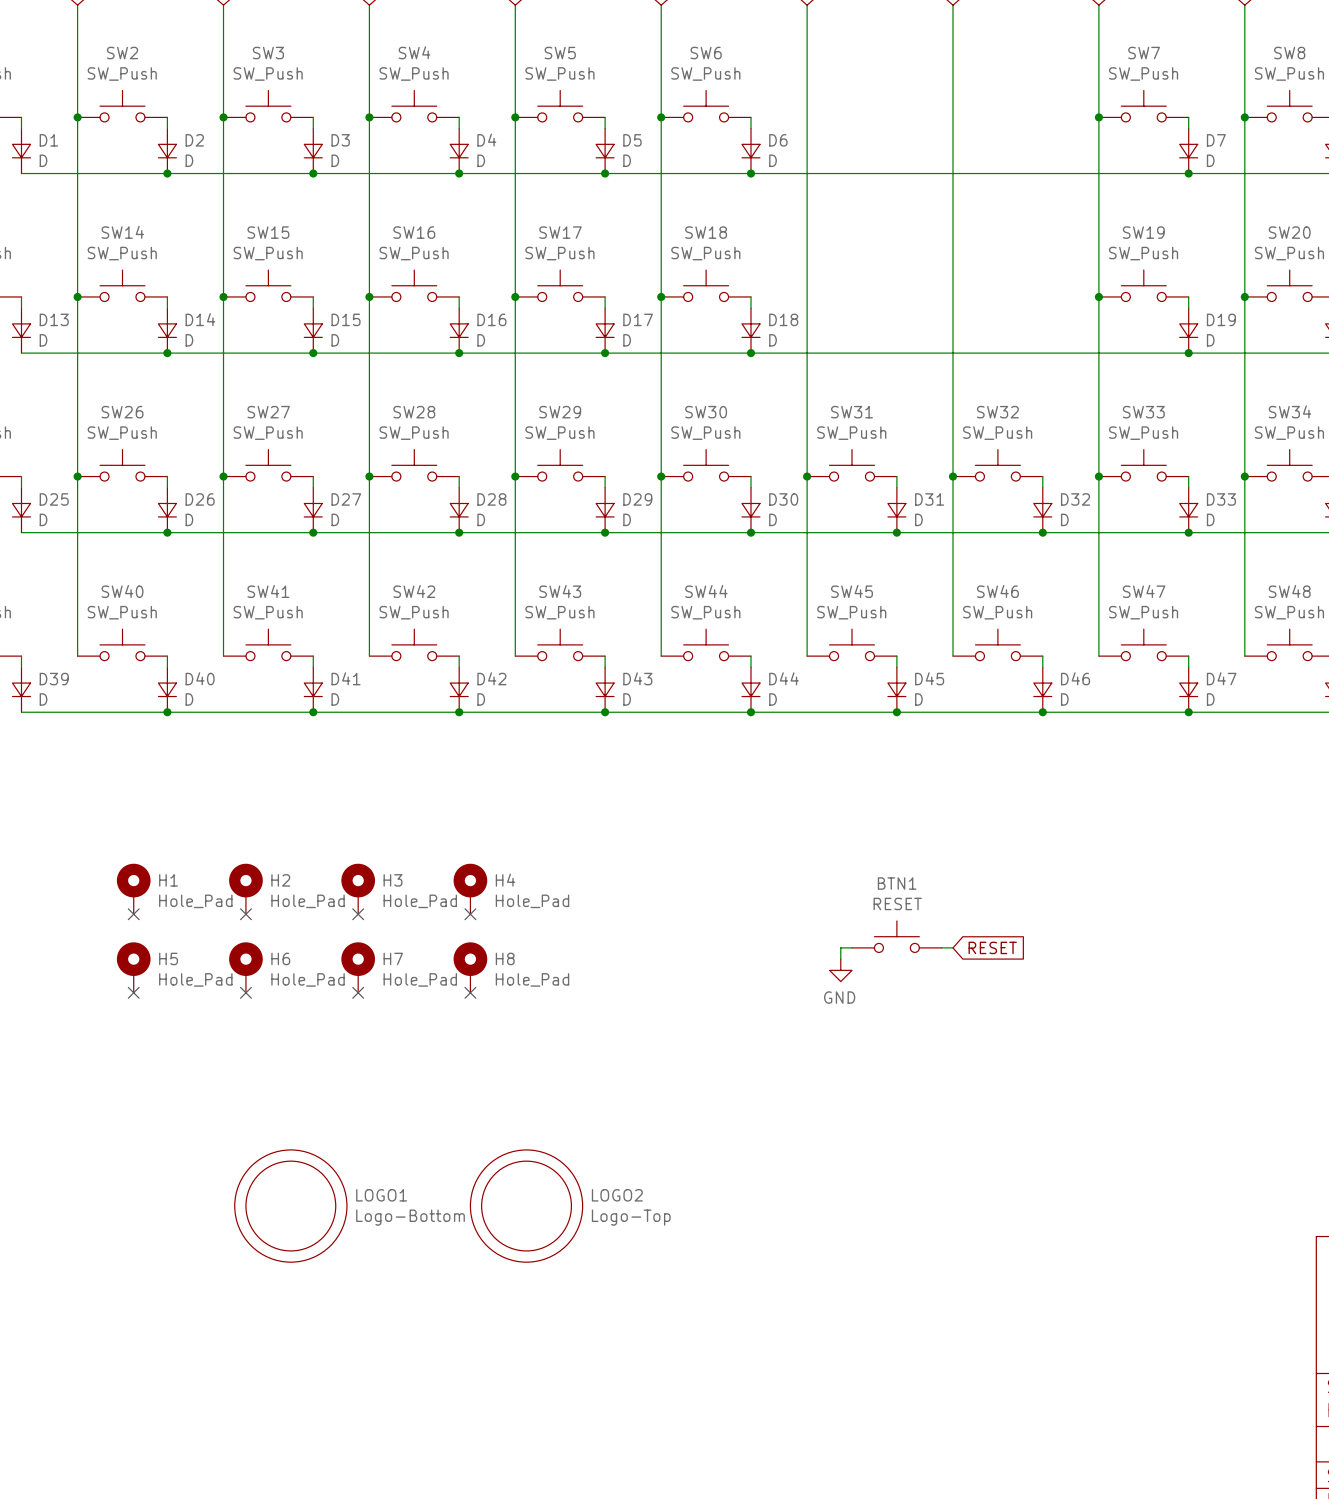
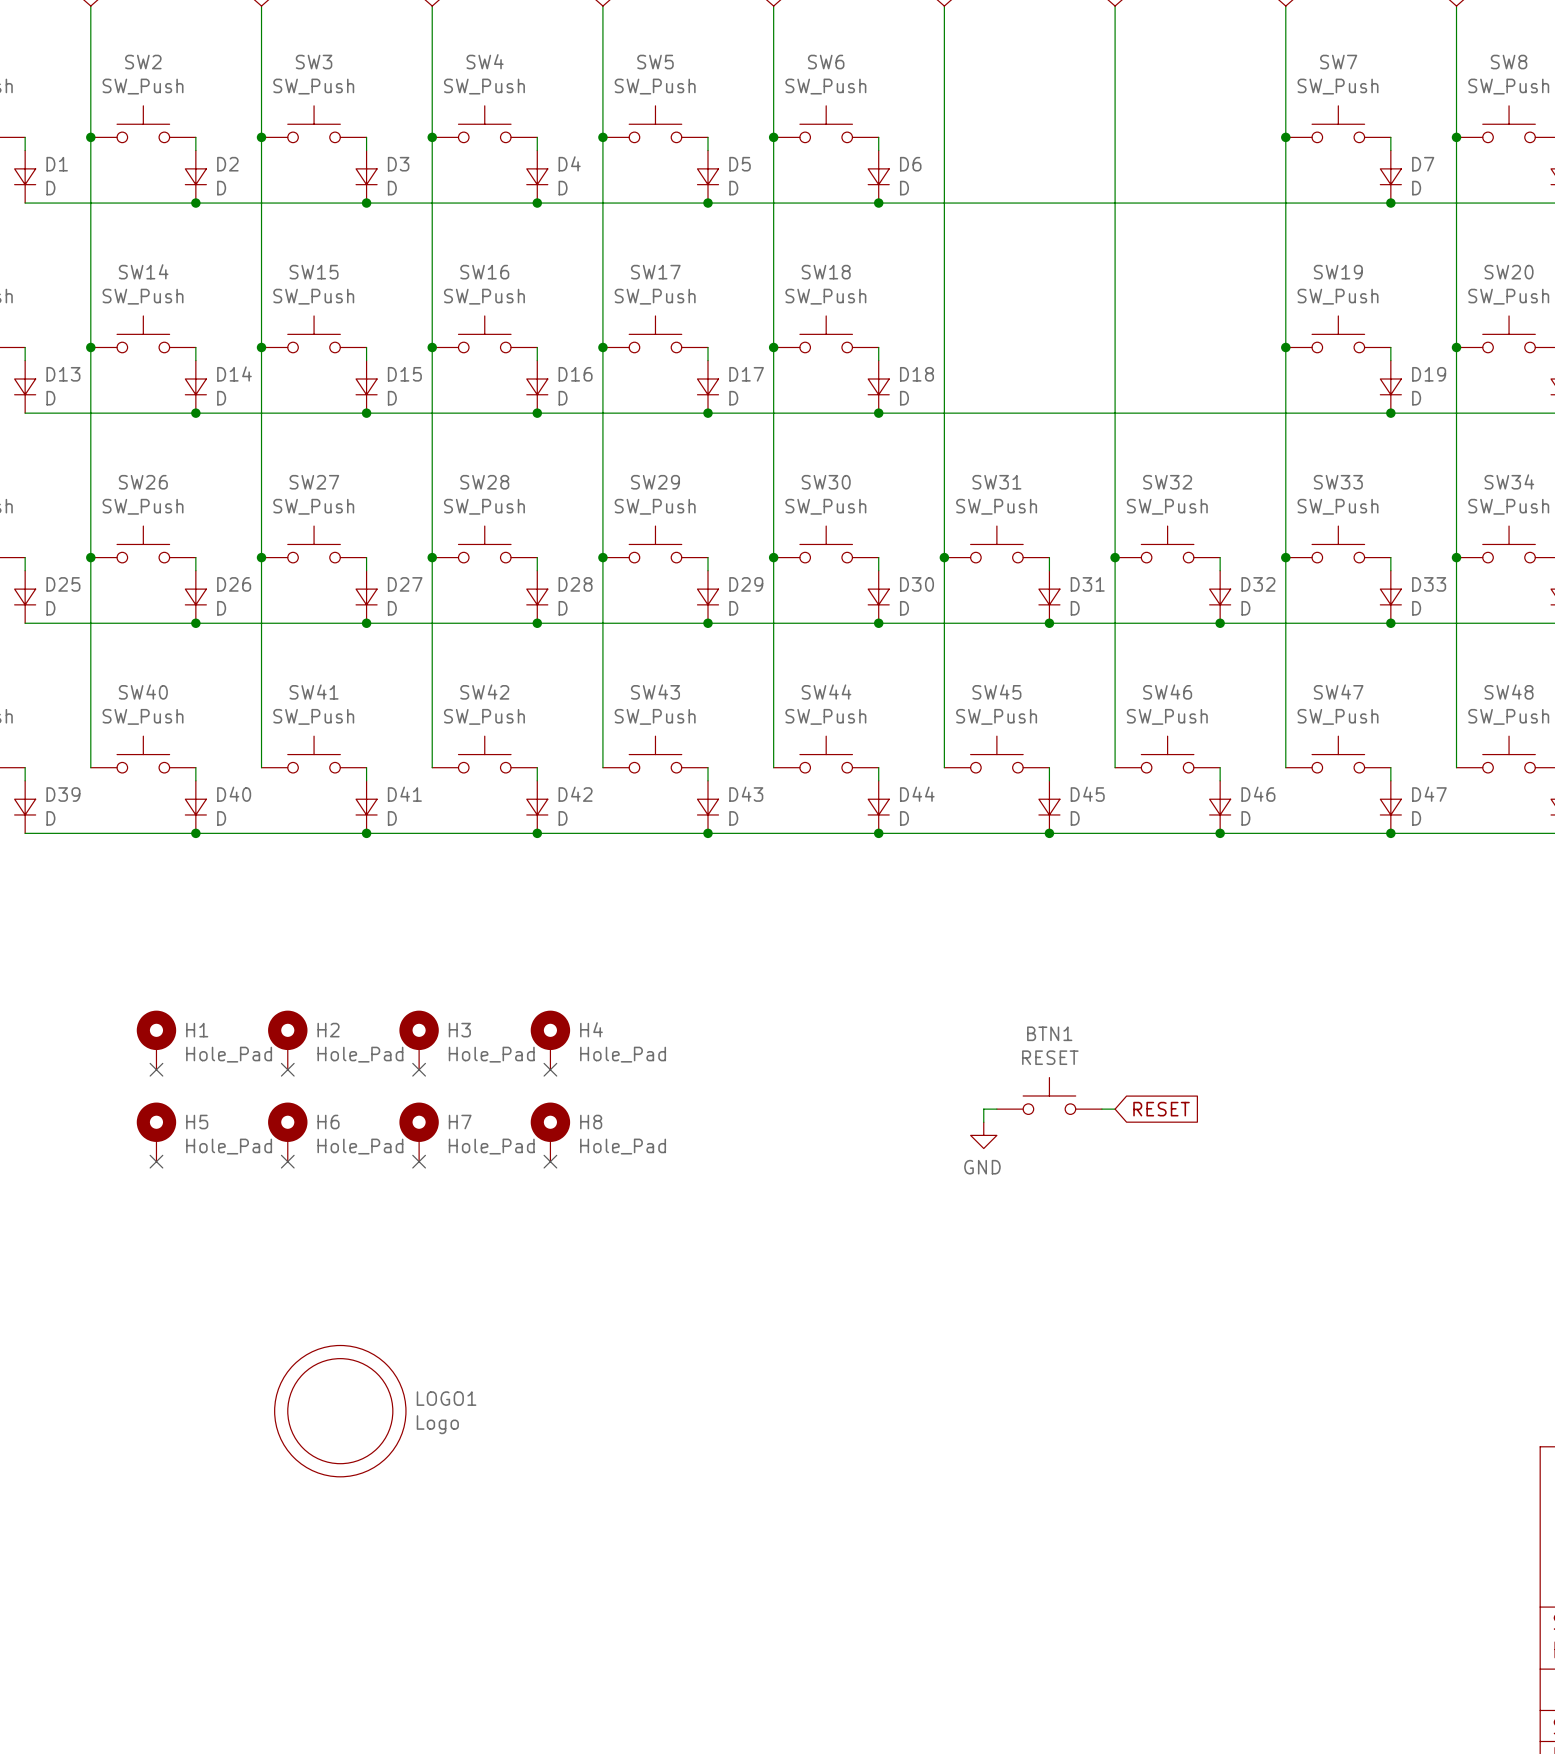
LOGO2: Logo-Top (526, 1206) -> none
LOGO1 value: Logo-Bottom (410, 1217) -> Logo (437, 1424)

